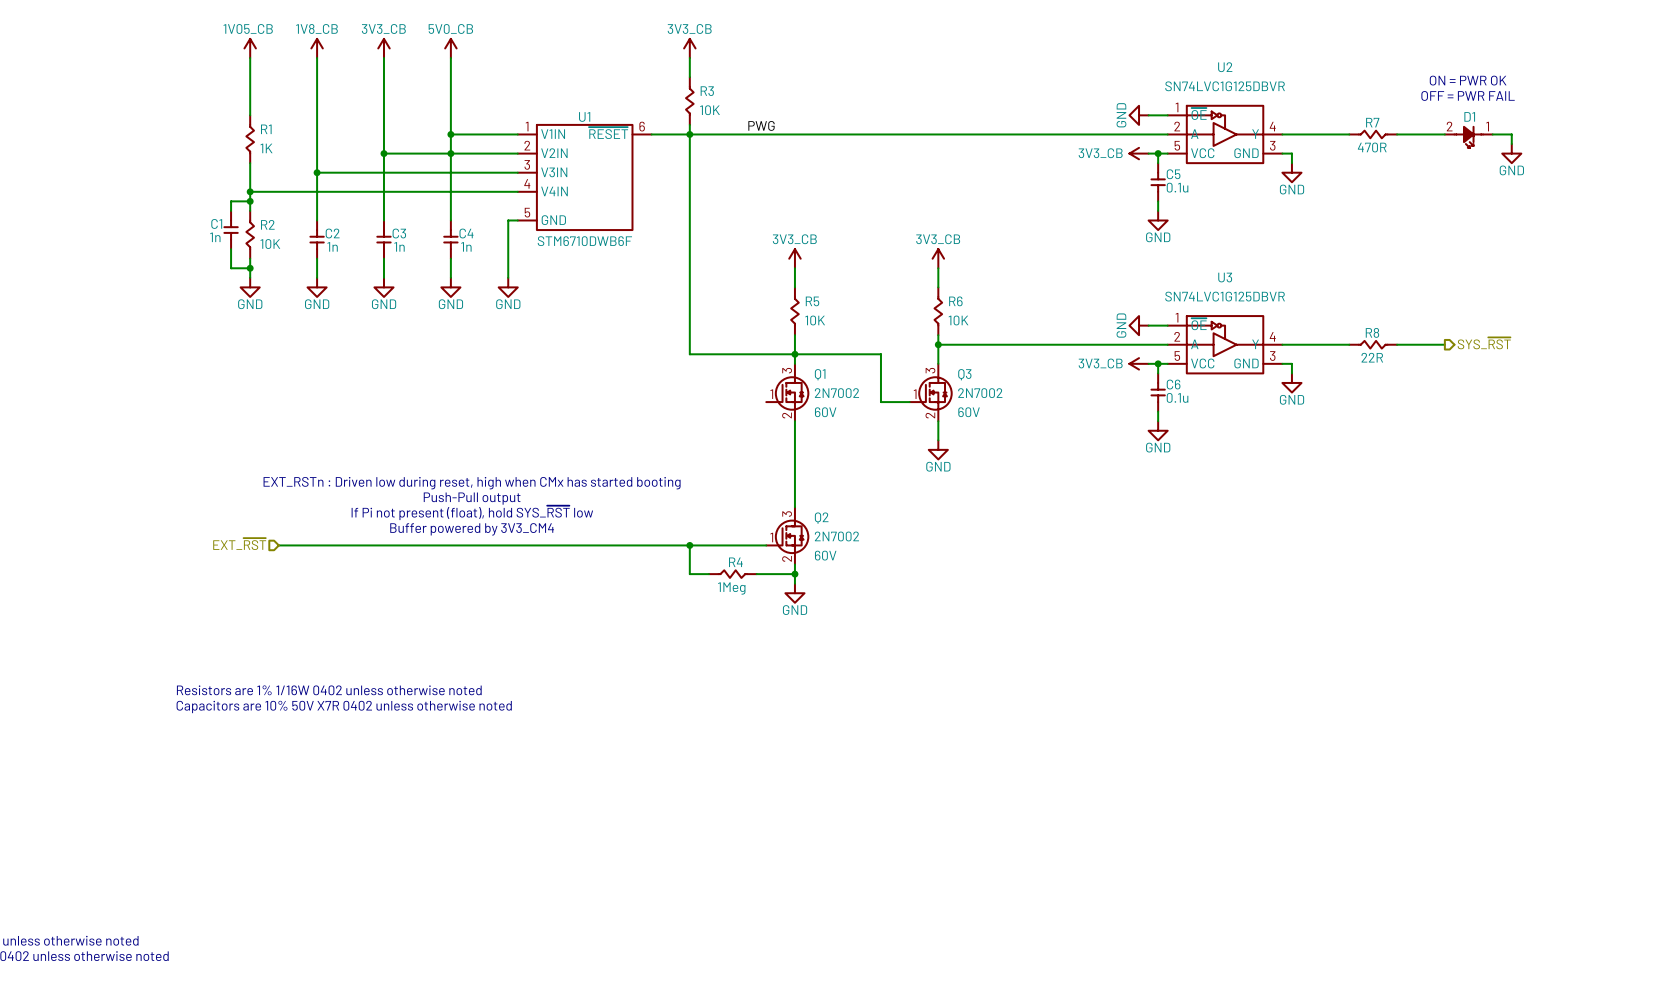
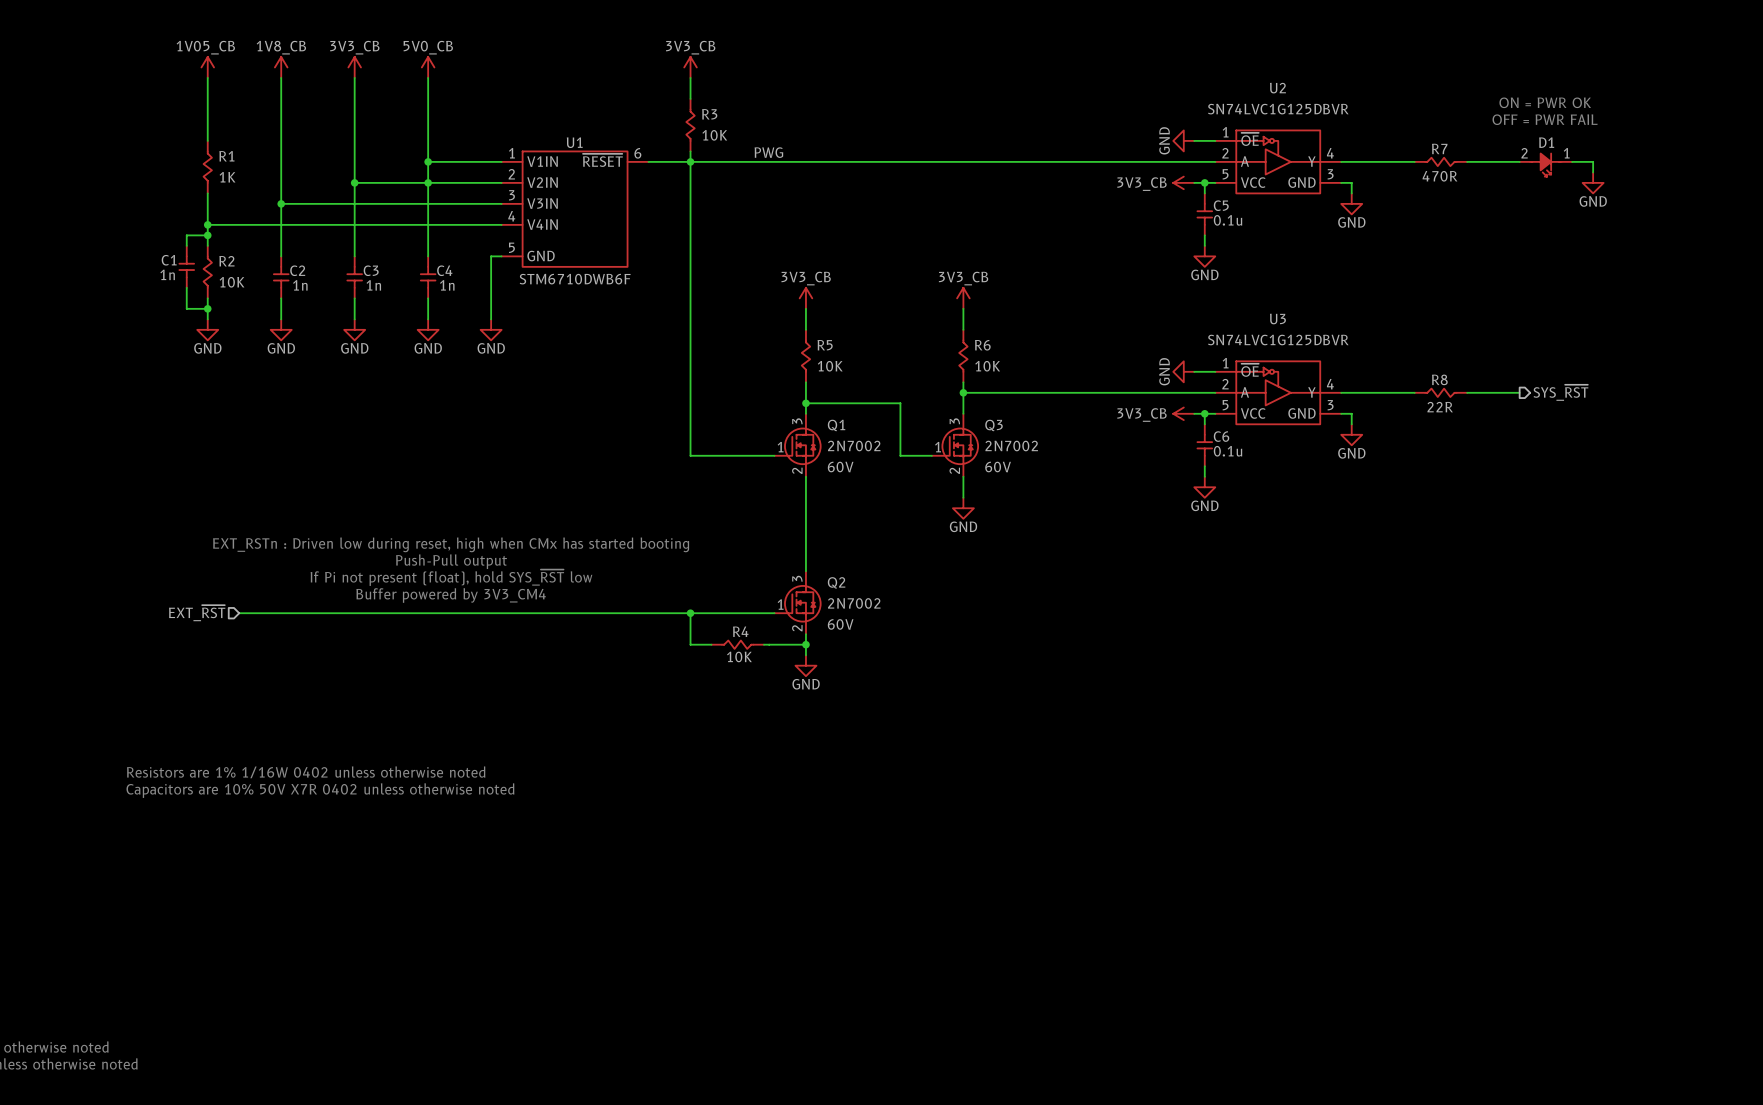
wire: (689, 354) (794, 354) -> (690, 403) (690, 455) (774, 455)
R4 value: 1Meg (731, 588) -> 10K (739, 656)

